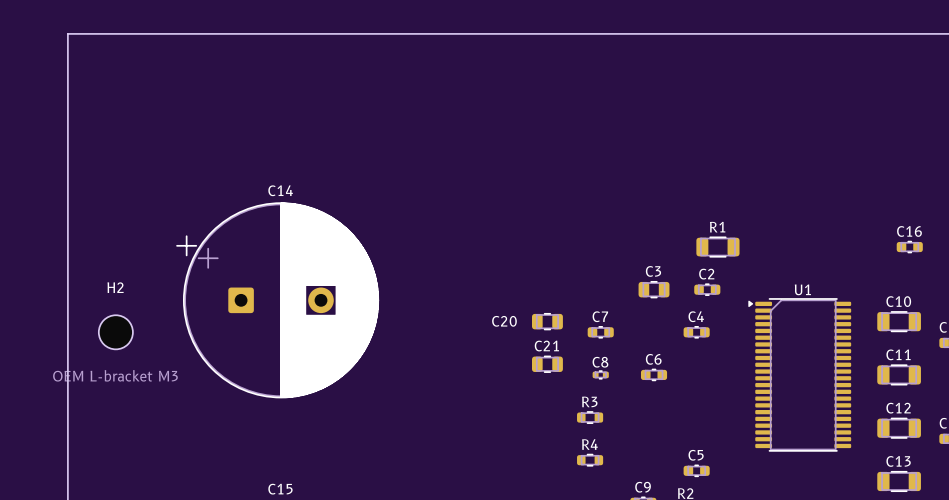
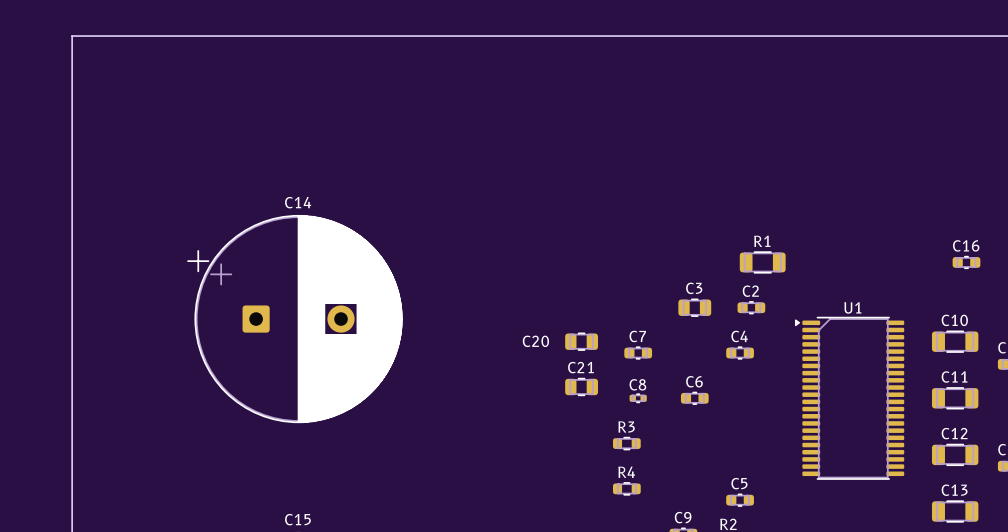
H2: OEM L-bracket M3 (115, 332) -> none

